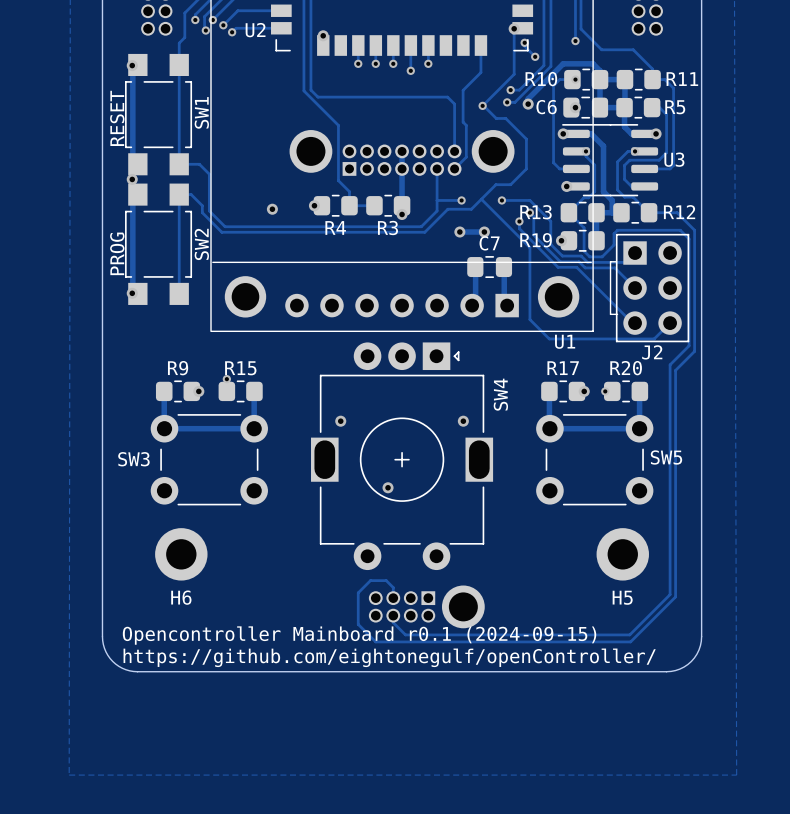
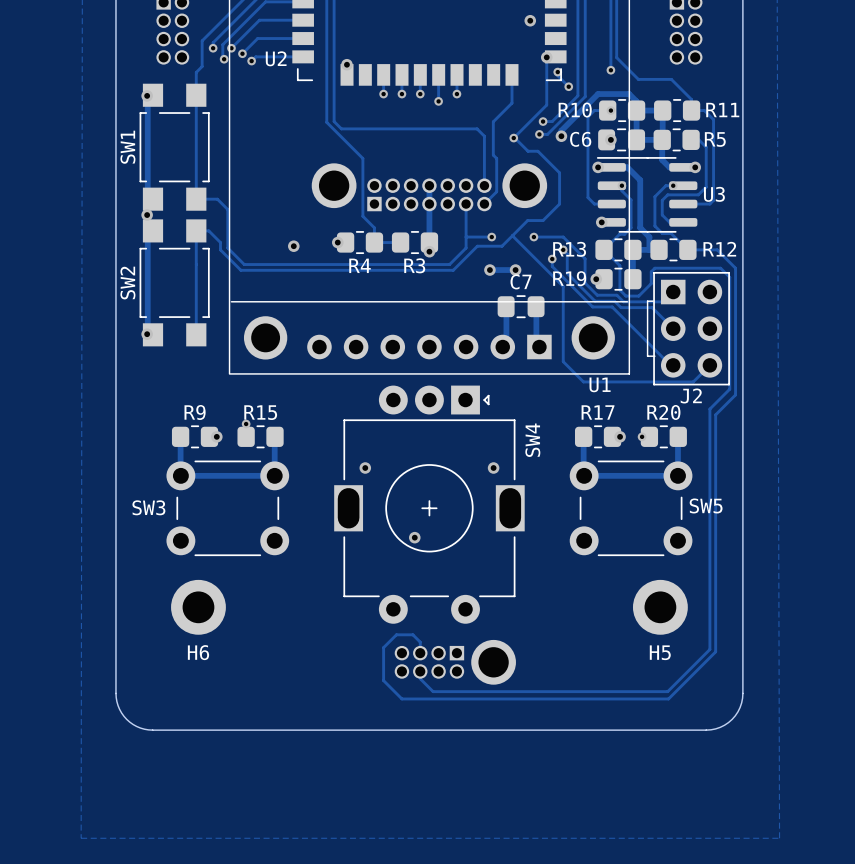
SW1 name position: SW1 (201, 112) -> SW1 (127, 147)
text: RESET (117, 118) -> none
SW2 name position: SW2 (201, 244) -> SW2 (127, 283)
text: PROG (117, 253) -> none
text: Opencontroller Mainboard r0.1 (2024-09-15) (359, 635) -> none
text: https://github.com/eightonegulf/openController/ (389, 657) -> none

